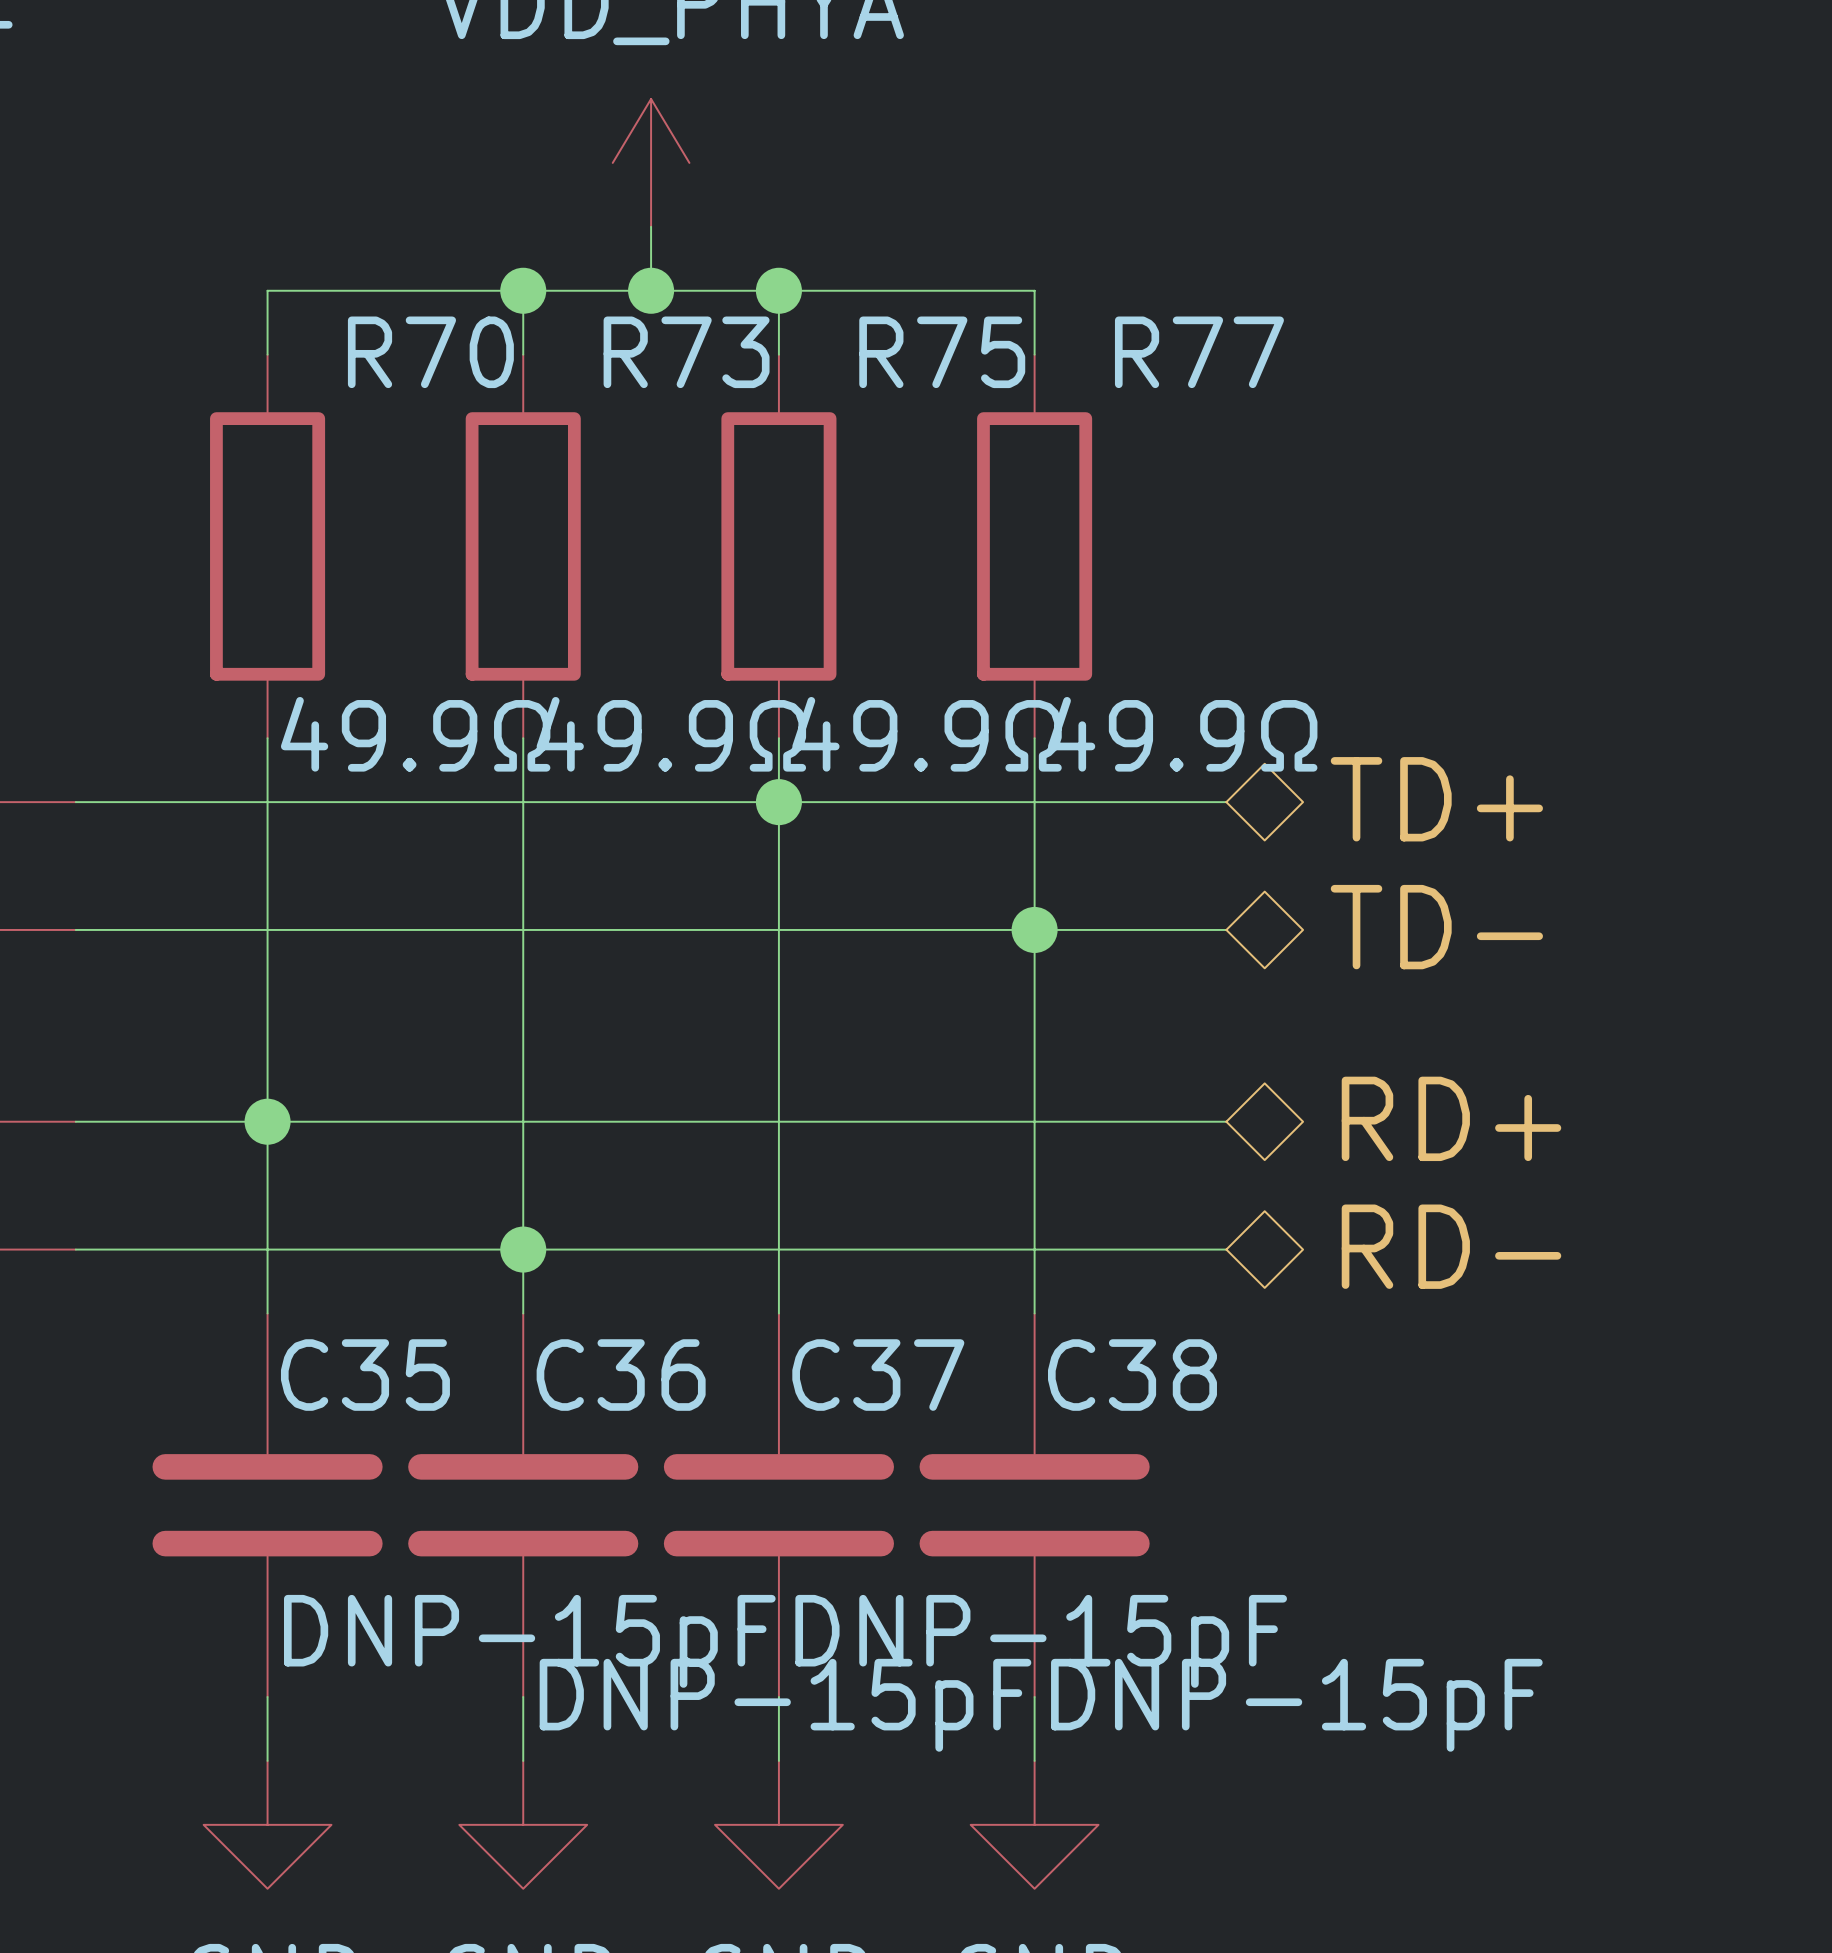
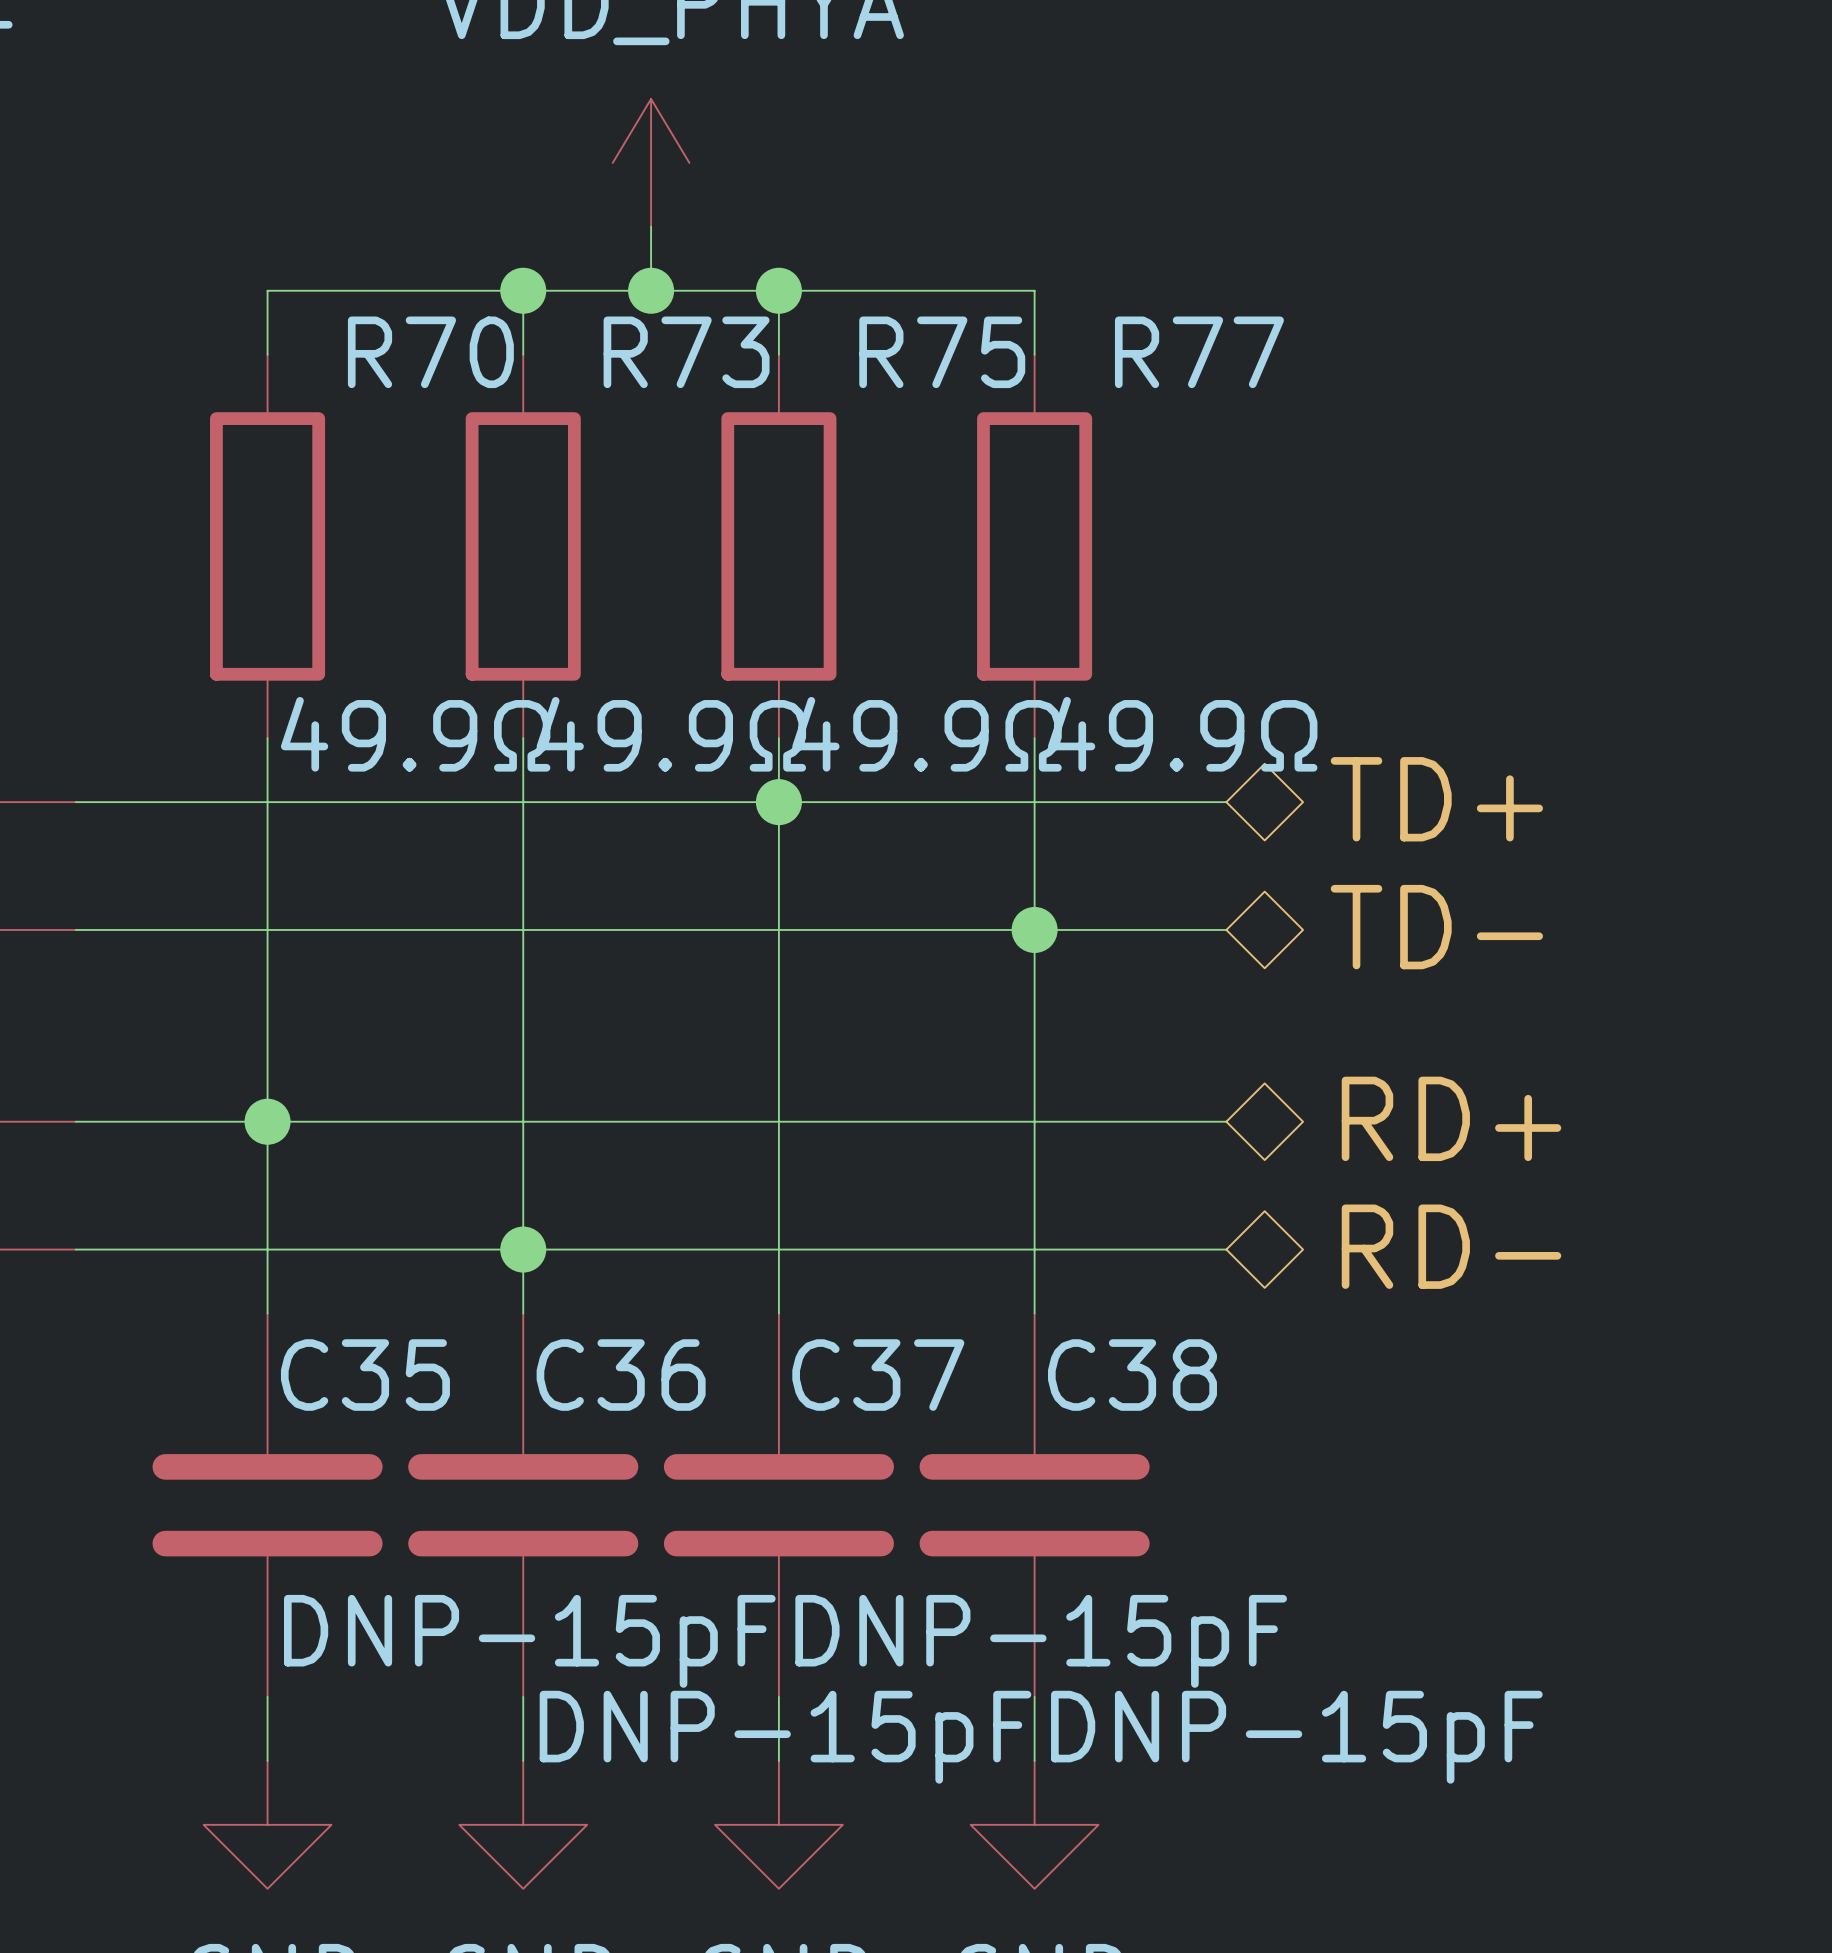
C36 value position: DNP-15pF (785, 1705) -> DNP-15pF (785, 1737)
C38 value position: DNP-15pF (1296, 1705) -> DNP-15pF (1296, 1737)

